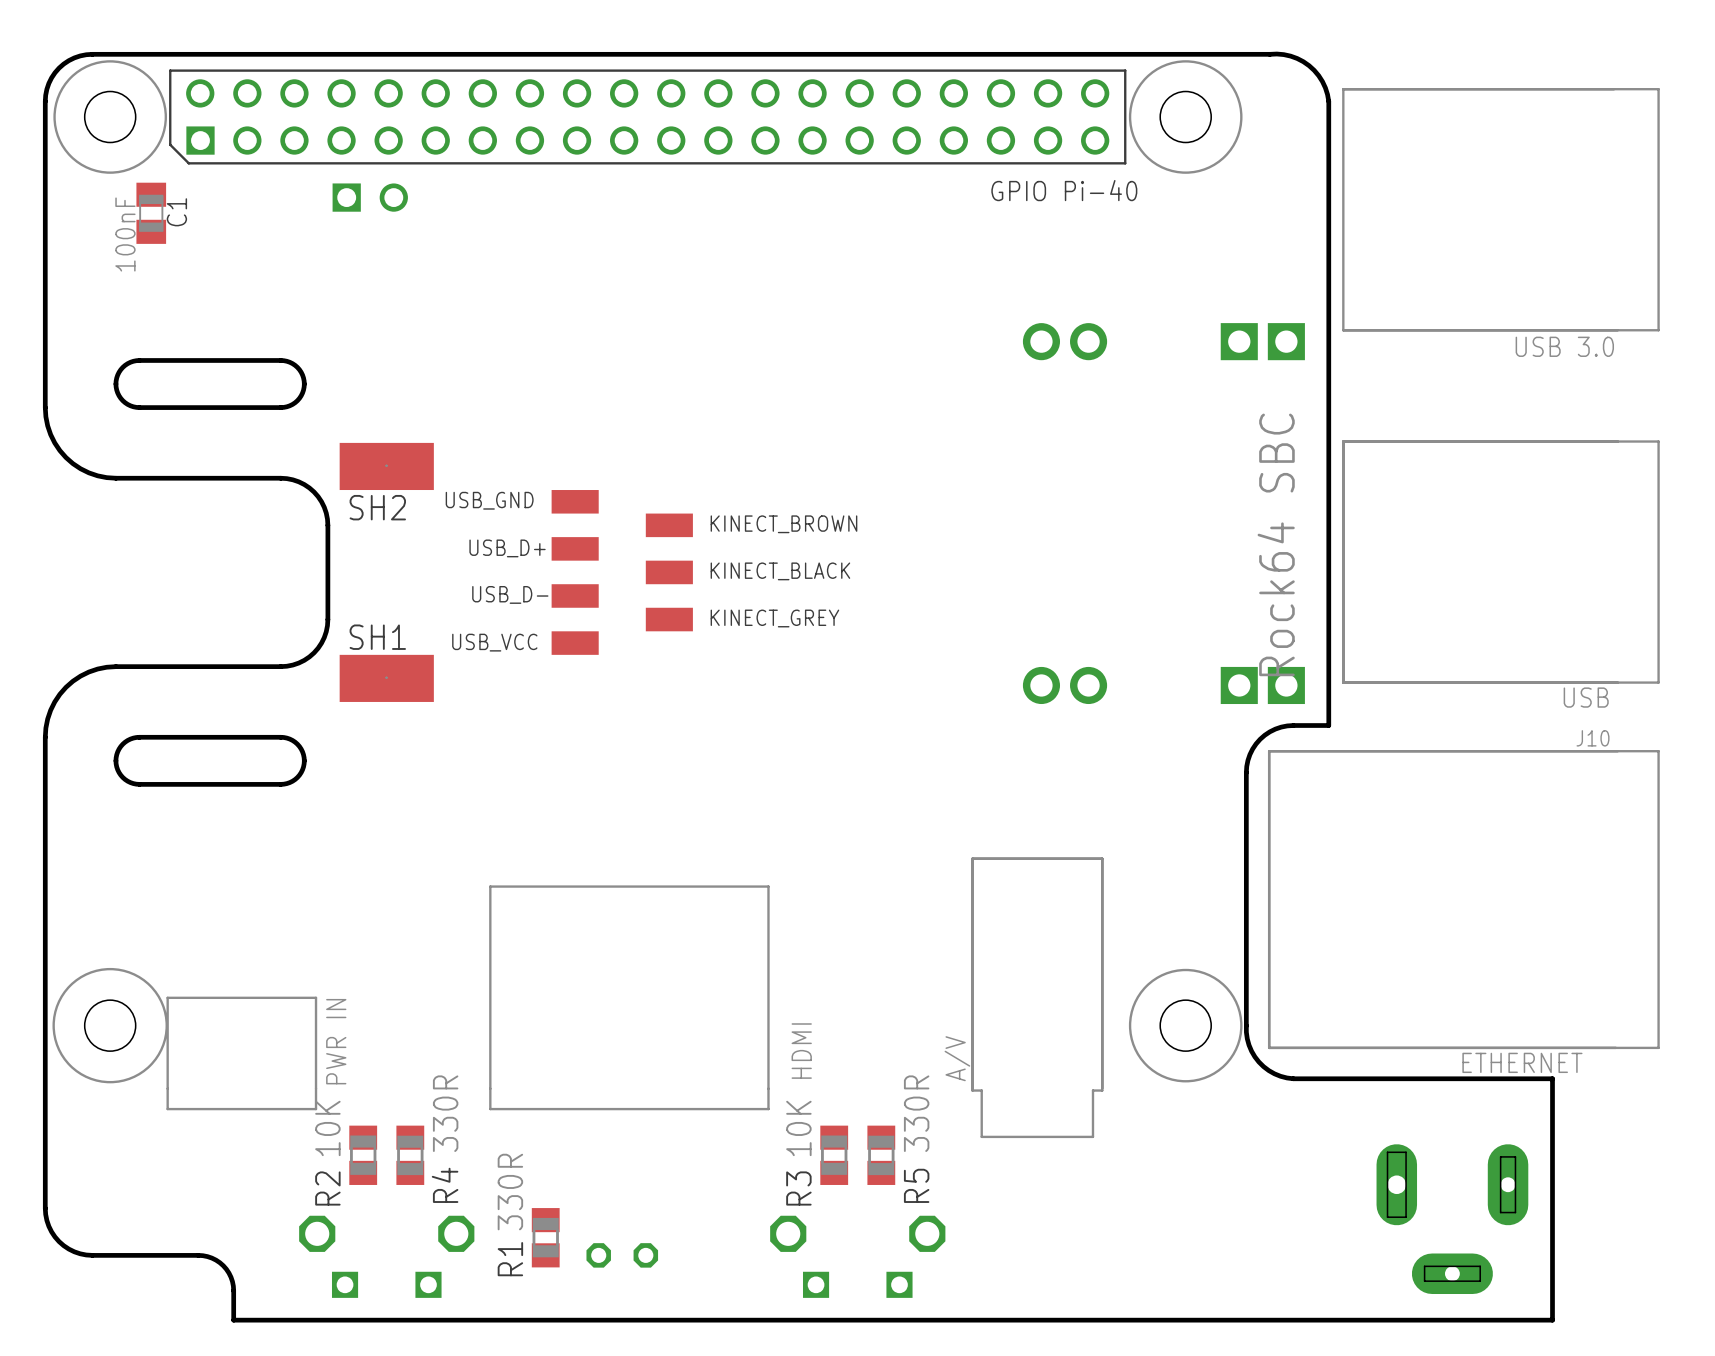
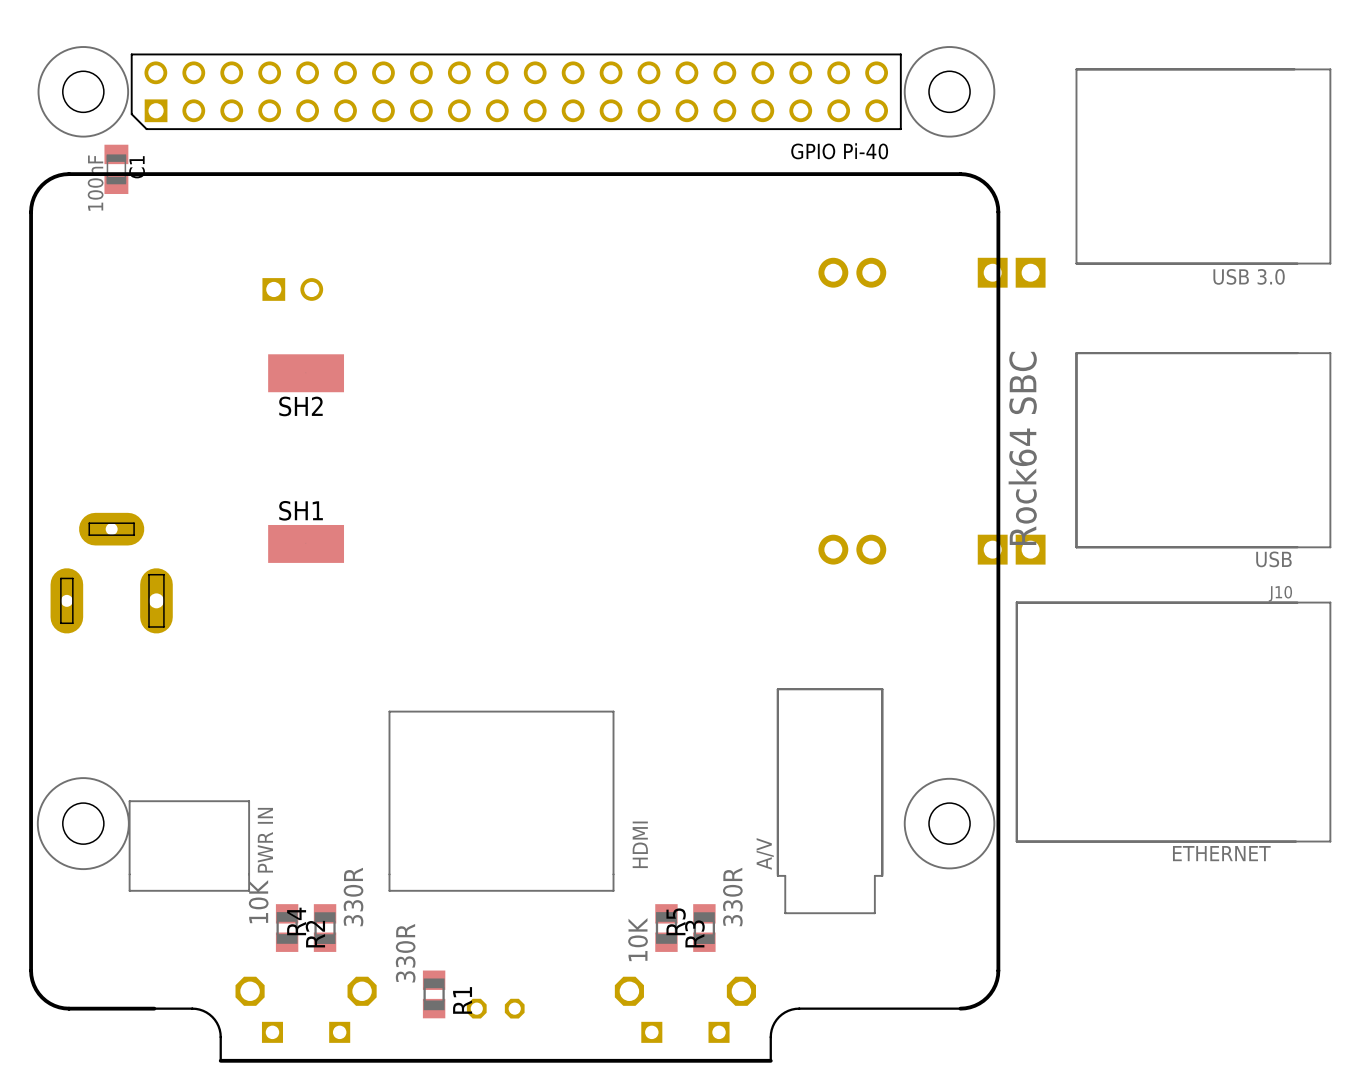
part position: (370, 197) -> (292, 289)
board edge: (45, 266) (45, 95) (48, 83) (59, 68) (74, 57) (86, 54) (1276, 54) (1297, 58) (1309, 65) (1318, 75) (1325, 87) (1328, 101) (1328, 725) (1287, 725) (1269, 731) (1260, 739) (1252, 749) (1247, 760) (1246, 772) -> (31, 212) (33, 197) (42, 185) (54, 176) (68, 174) (960, 174) (974, 176) (990, 188) (997, 202) (998, 212) (998, 619)
board edge: (139, 360) (283, 360) (292, 363) (299, 369) (303, 377) (304, 387) (297, 400) (283, 407) (136, 407) (127, 404) (120, 398) (115, 384) (117, 375) (122, 367) (130, 362) (139, 360) -> none
board edge: (45, 407) (47, 425) (54, 442) (72, 463) (88, 472) (115, 478) (292, 479) (309, 487) (318, 496) (326, 513) (327, 525) (327, 625) (321, 643) (309, 656) (292, 665) (280, 666) (115, 666) (97, 669) (80, 676) (59, 694) (47, 719) (45, 737) -> (31, 325) (31, 591)
USB_GND: (575, 501) -> none
KINECT_BROWN: (669, 525) -> none
USB_D+: (575, 548) -> none
KINECT_BLACK: (669, 572) -> none
USB_D-: (575, 595) -> none
KINECT_GREY: (669, 619) -> none
USB_VCC: (575, 643) -> none
part: none -> (111, 573)
board edge: (139, 737) (283, 737) (292, 740) (299, 746) (303, 754) (304, 763) (297, 777) (283, 784) (136, 784) (127, 781) (120, 775) (115, 760) (117, 751) (122, 744) (130, 739) (139, 737) -> none
board edge: (1246, 1025) (1249, 1045) (1254, 1056) (1268, 1070) (1286, 1077) (1552, 1078) (1552, 1320) (963, 1320) -> (998, 823) (998, 970) (995, 985) (987, 997) (974, 1005) (960, 1008) (791, 1009) (781, 1014) (772, 1026) (770, 1060)
R3 value position: 10K (798, 1128) -> 10K (638, 939)
R4 name position: R4 (445, 1185) -> R4 (296, 921)
R5 name position: R5 (916, 1185) -> R5 (676, 921)
R2 name position: R2 (327, 1188) -> R2 (315, 934)
R3 name position: R3 (798, 1188) -> R3 (694, 933)
part: (1452, 1219) -> none
board edge: (198, 1255) (216, 1260) (228, 1273) (233, 1286) (233, 1320) (280, 1320) -> (154, 1008) (195, 1008) (209, 1014) (219, 1029) (220, 1060)
R1 name position: R1 (510, 1259) -> R1 (462, 1000)

